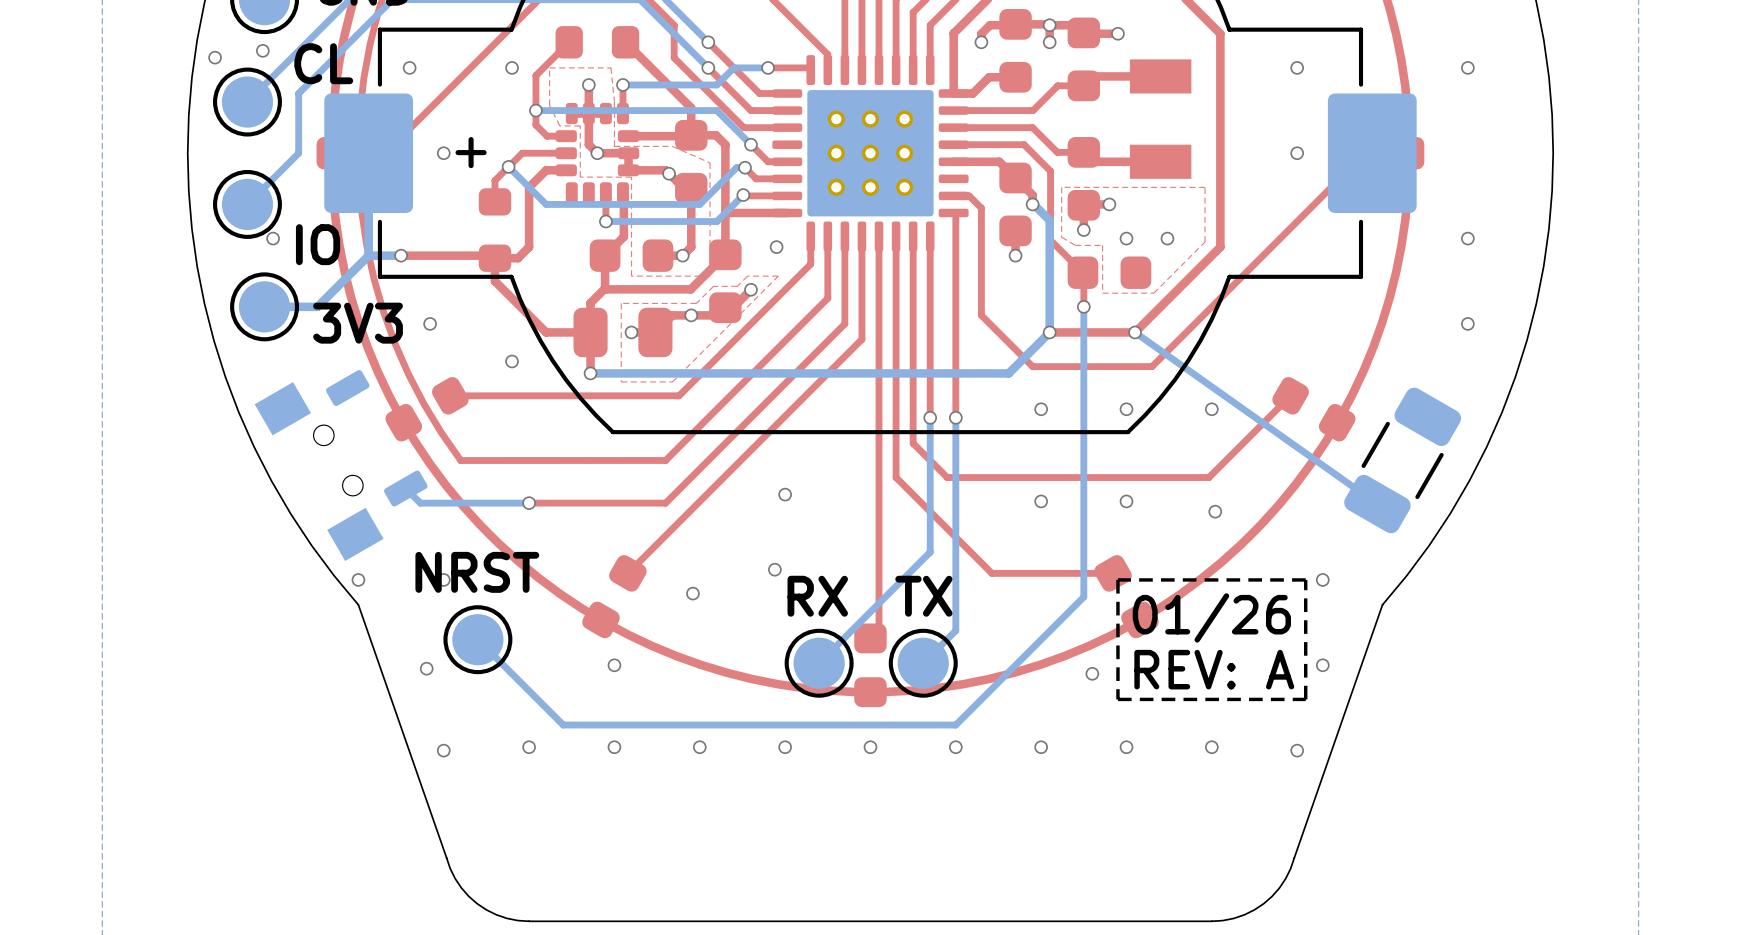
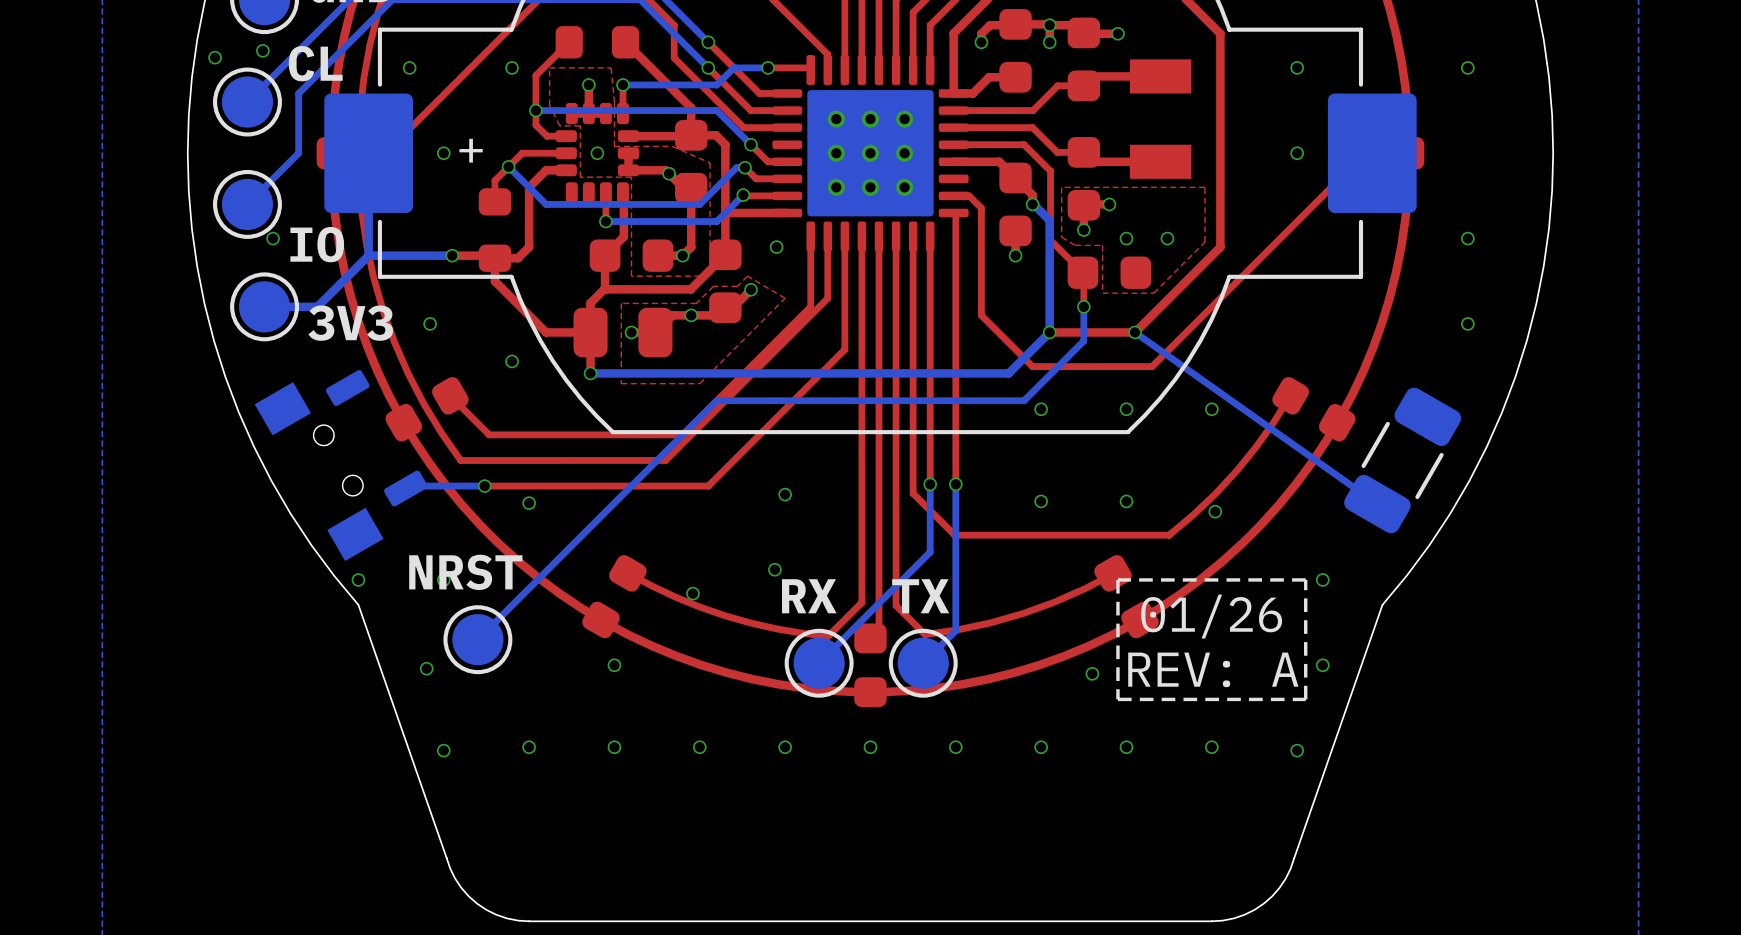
top track: (588, 113) (588, 144) (597, 153) (628, 153) -> none
via position: (401, 255) -> (452, 255)
top track: (452, 255) (401, 255) -> none
bottom track: none -> (452, 255) (401, 255)
top track: (810, 264) (679, 395) (450, 395) -> (810, 264) (810, 306) (682, 434) (489, 434) (450, 395)
top zone outline: (747, 276) (778, 276) (672, 381) (621, 381) -> (747, 276) (785, 298) (699, 383) (621, 383) (621, 381)
top track: (844, 323) (665, 503) (529, 503) -> (844, 323) (844, 349) (708, 486) (484, 486)
top track: (861, 339) (627, 573) -> (861, 339) (861, 602) (828, 636) (775, 628) (724, 615) (675, 597) (628, 573)
bottom track: (1083, 340) (1083, 597) (955, 725) (563, 725) (477, 639) -> (1083, 340) (1024, 400) (716, 400) (477, 639)
top track: (1290, 395) (1208, 477) (947, 477) (913, 443) -> (1290, 395) (1256, 447) (1236, 471) (1215, 493) (1169, 535) (954, 535) (913, 493) (913, 443)
top track: none -> (930, 417) (930, 484)
bottom track: (930, 417) (930, 484) -> none
via: (930, 417) -> none
top track: none -> (955, 417) (955, 484)
bottom track: (955, 417) (955, 484) -> none
via: (955, 417) -> none
top track: (896, 477) (991, 573) (1113, 573) -> (896, 477) (896, 605) (925, 634) (958, 629) (1023, 613) (1085, 588) (1114, 573)
via: none -> (930, 484)
via: none -> (955, 484)
via: none -> (484, 486)
bottom track: (405, 488) (420, 503) (529, 503) -> (405, 488) (408, 486) (484, 486)

